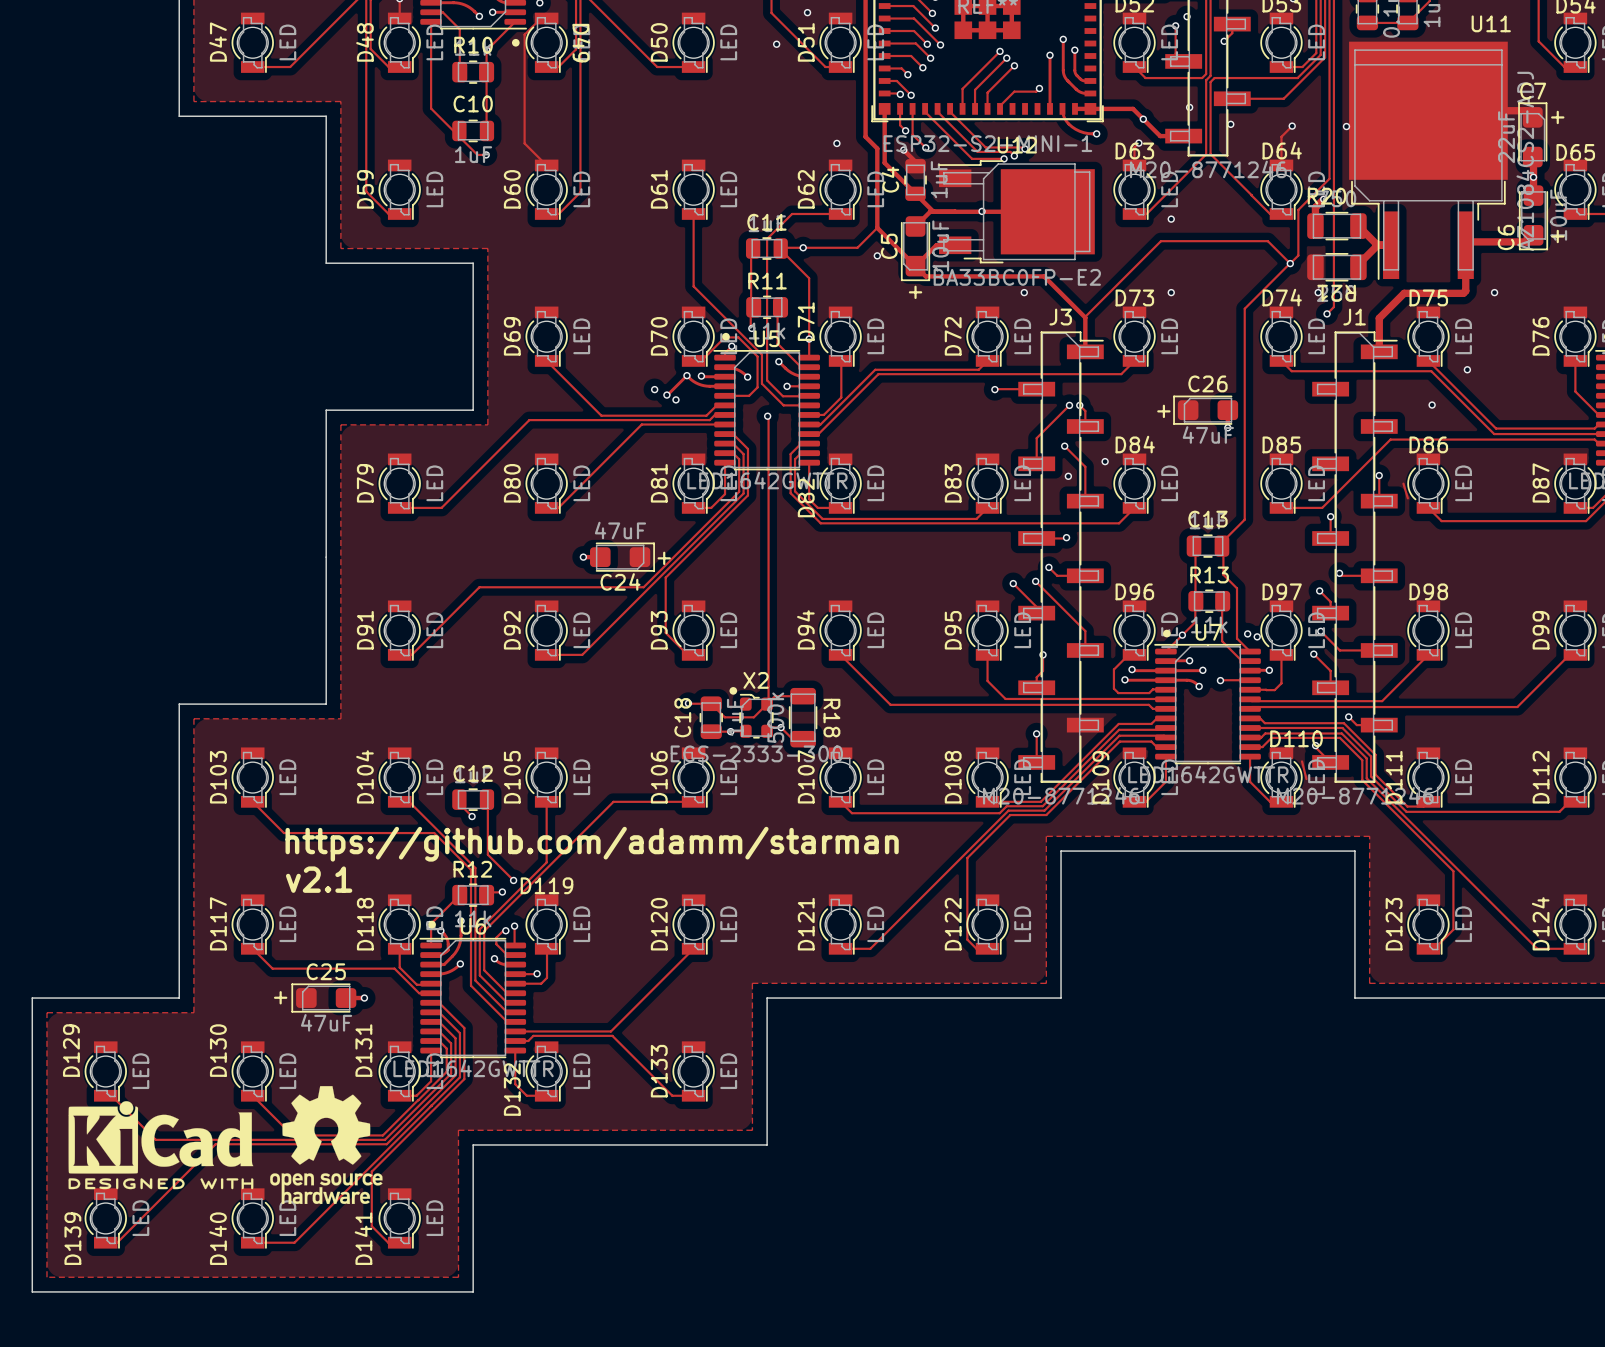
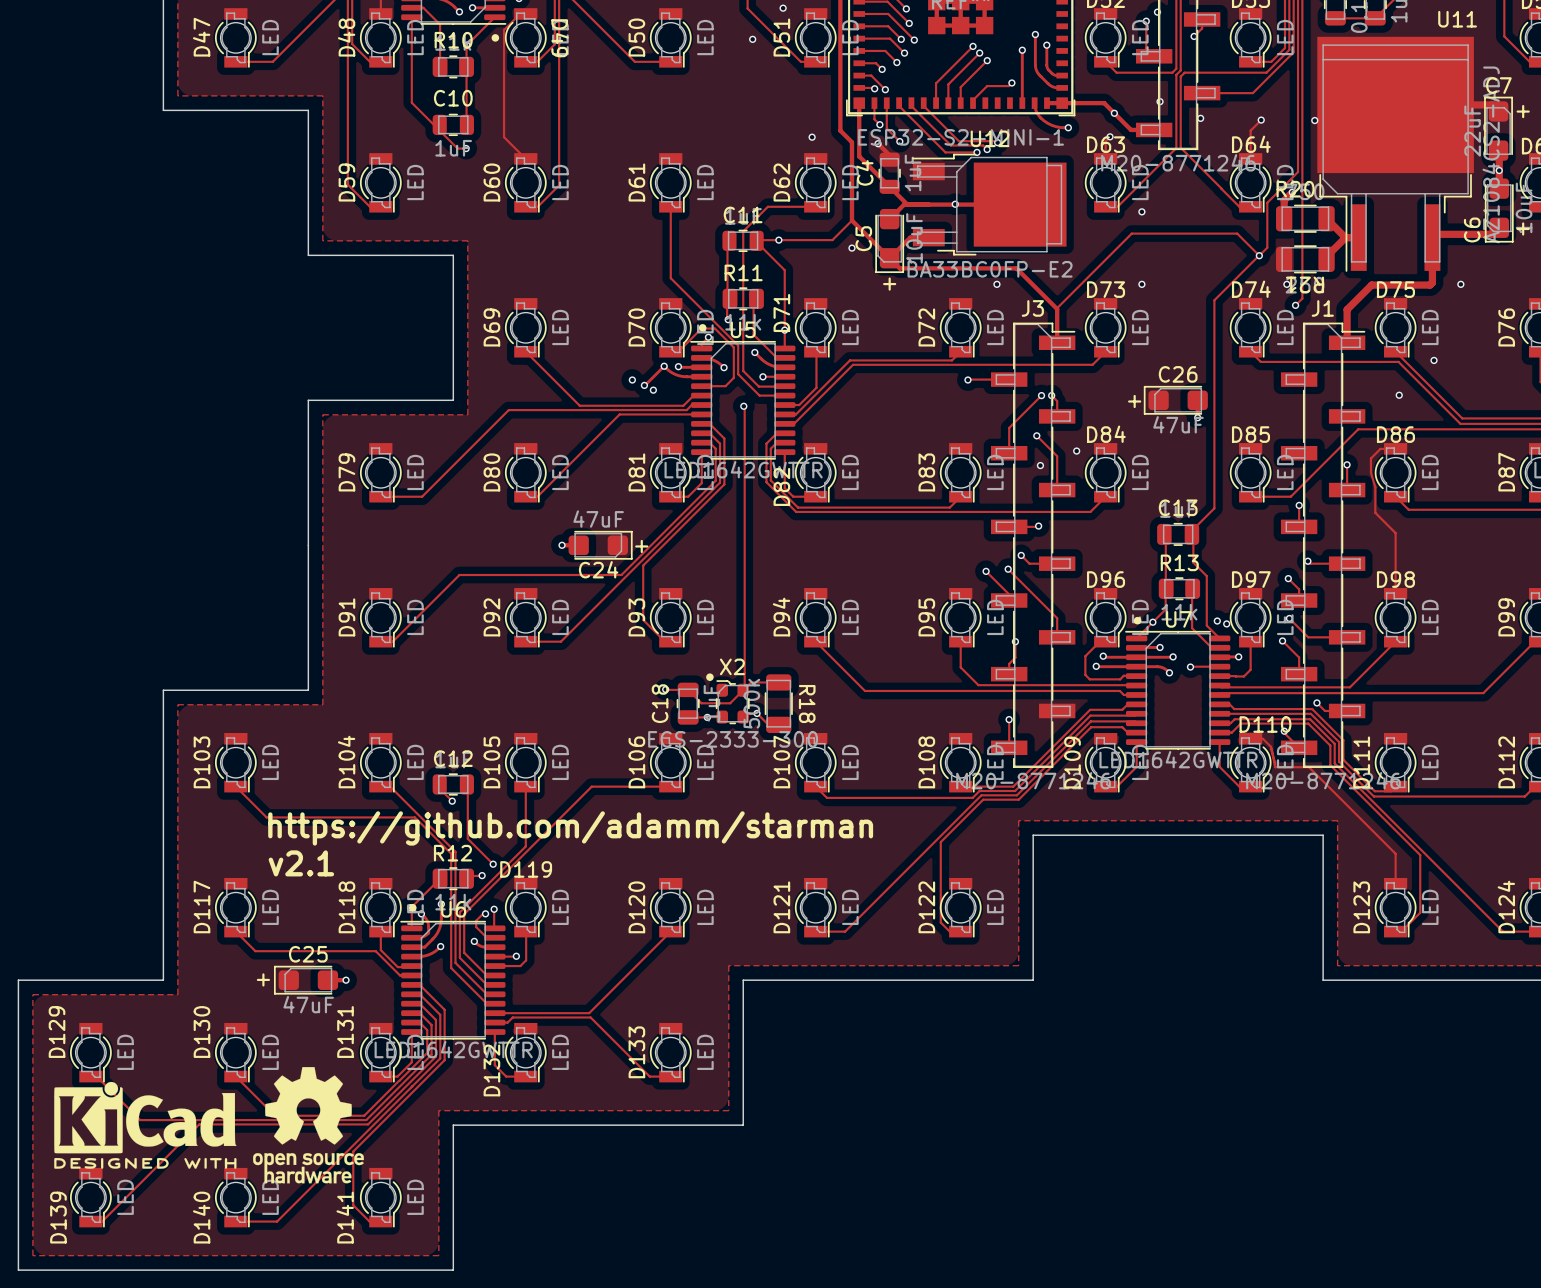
track: none -> (1387, 448) (1380, 448) (1370, 458) (1370, 472)
track: none -> (1375, 487) (1375, 512) (1395, 533) (1395, 593)
track: none -> (1250, 738) (1262, 738) (1270, 746) (1275, 767) (1309, 767) (1395, 853) (1395, 883)

